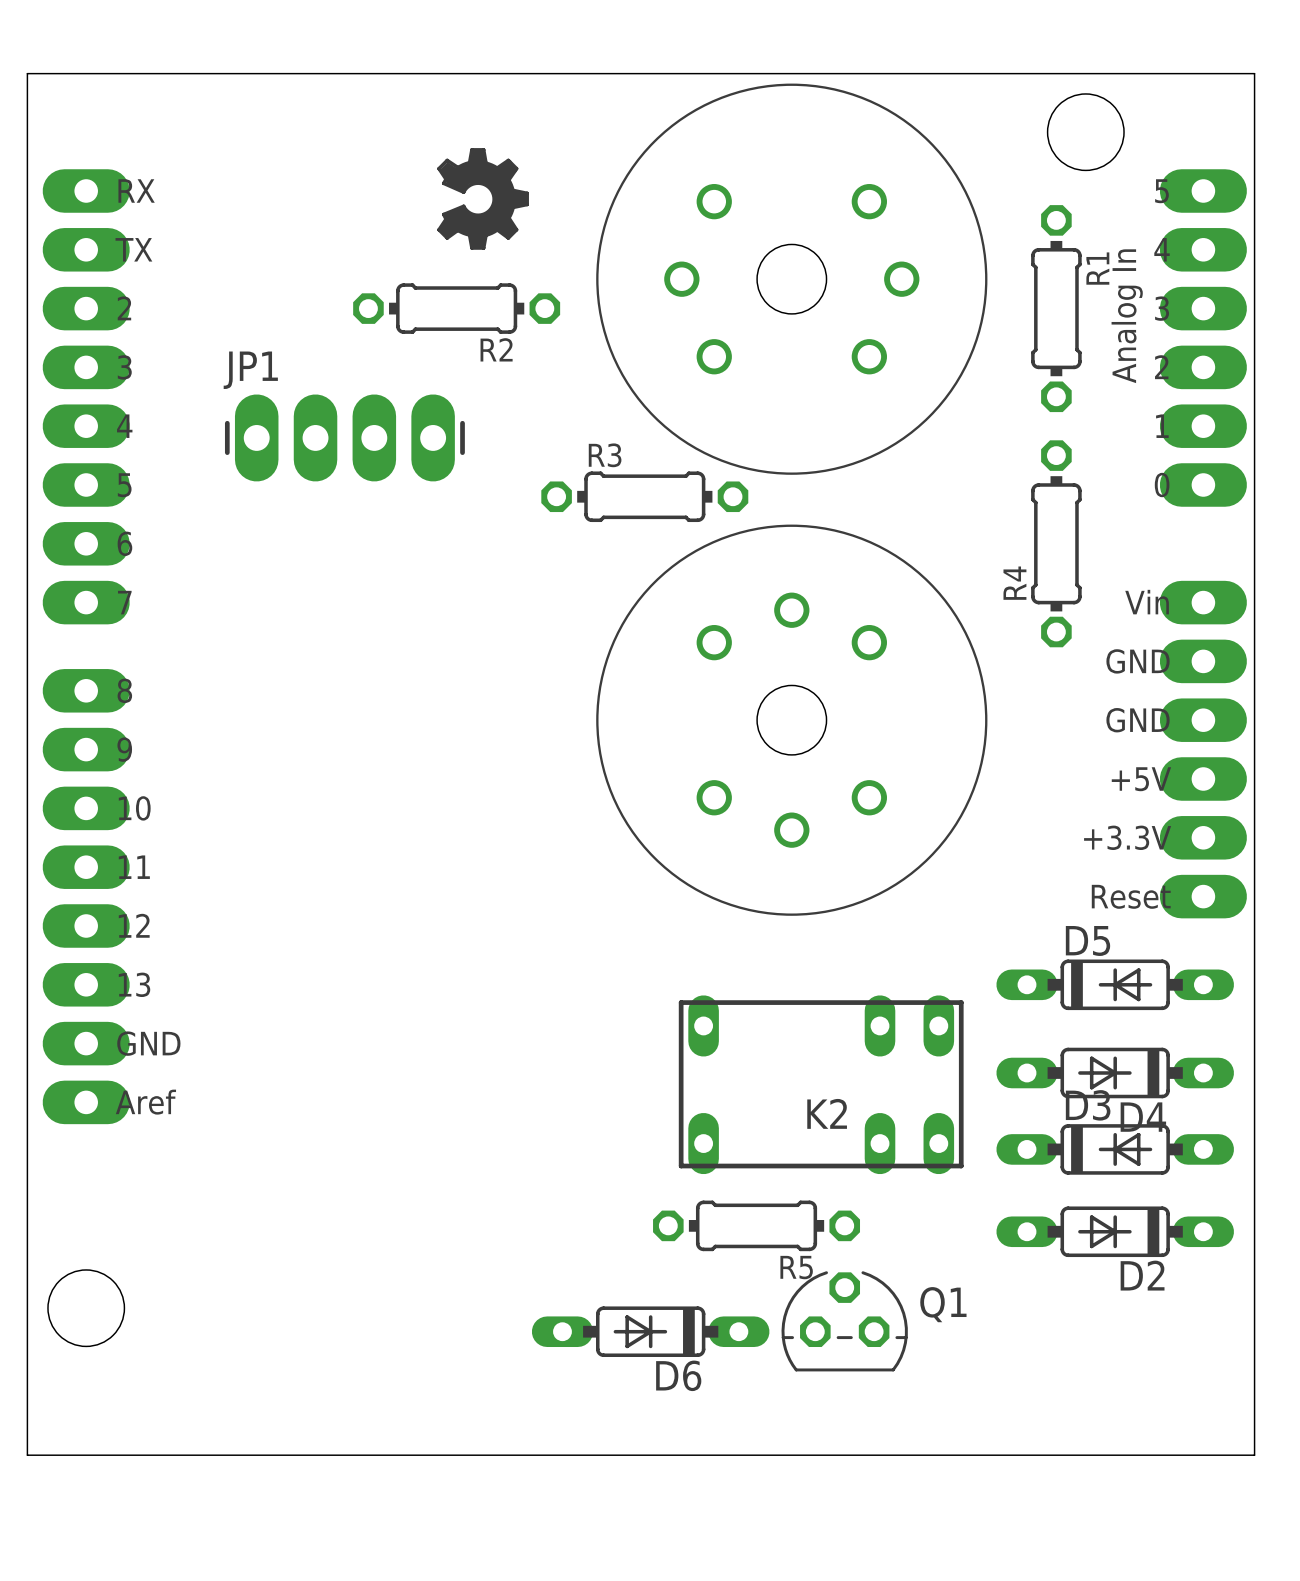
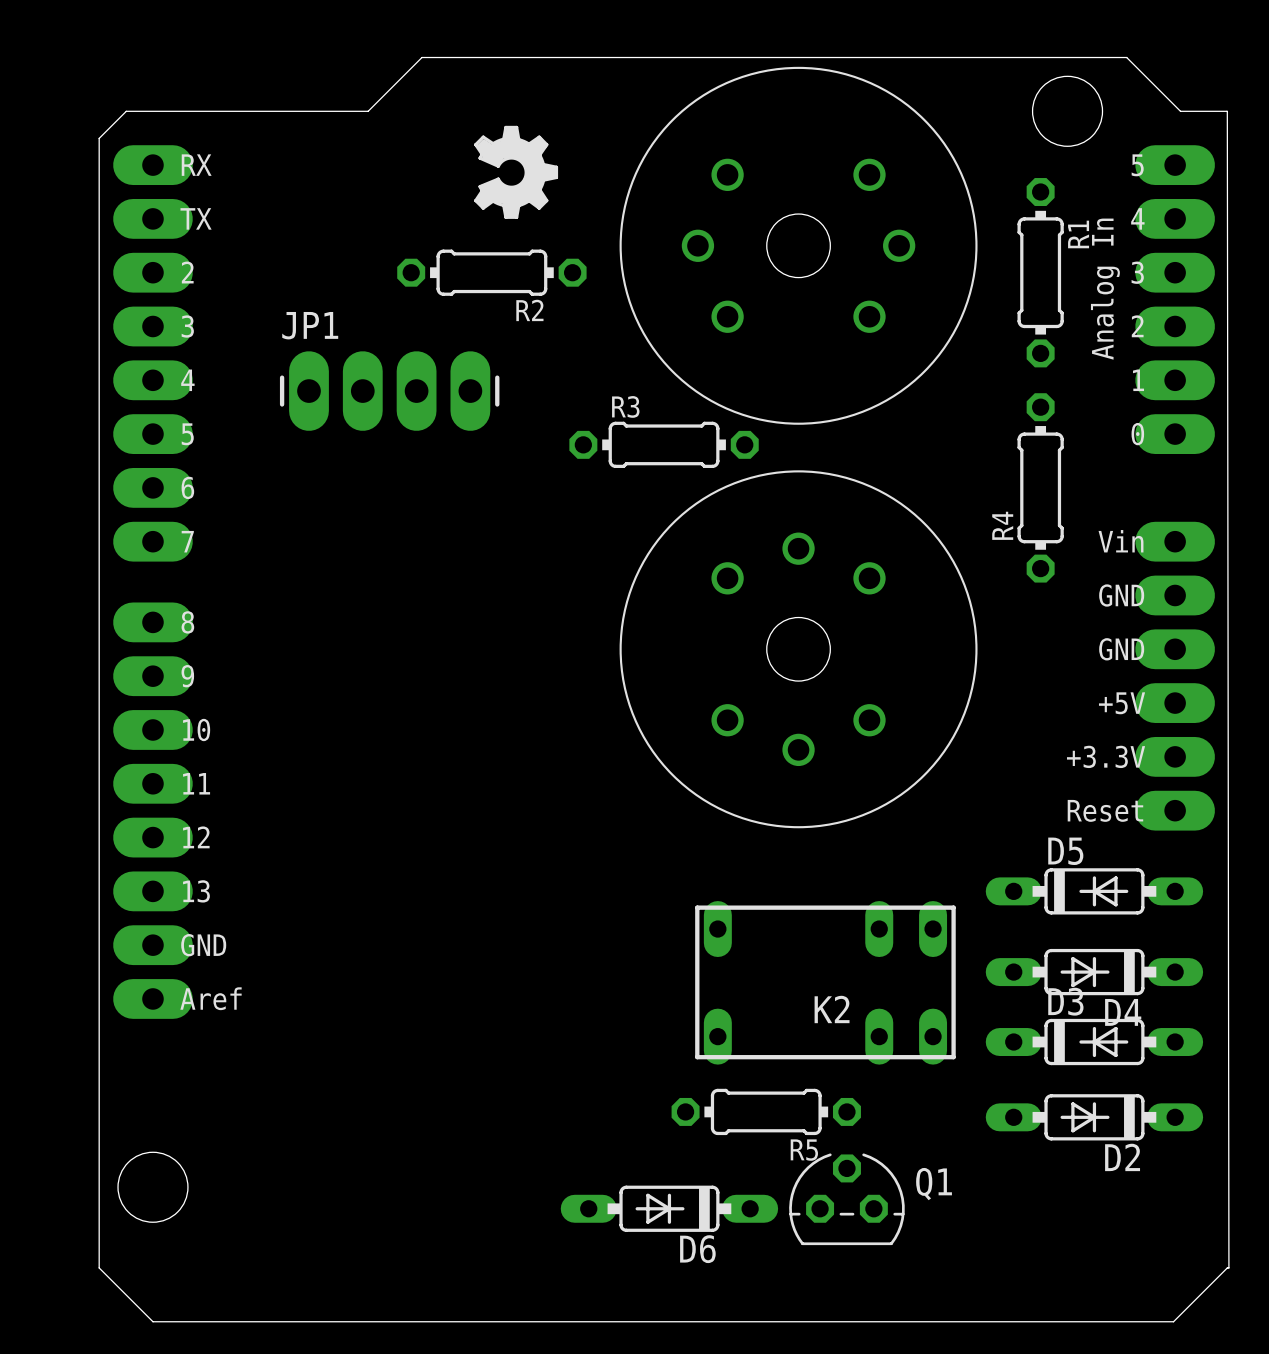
board edge: none -> (1227, 111) (1180, 111) (1126, 57) (421, 57) (368, 111) (126, 111) (99, 138)
board edge: (27, 161) (27, 73) (1254, 73) (1254, 1455) (1201, 1455) -> (1227, 111) (1228, 1267) (1173, 1321)
board edge: (27, 1396) (27, 1455) (86, 1455) -> (99, 1267) (152, 1321)

